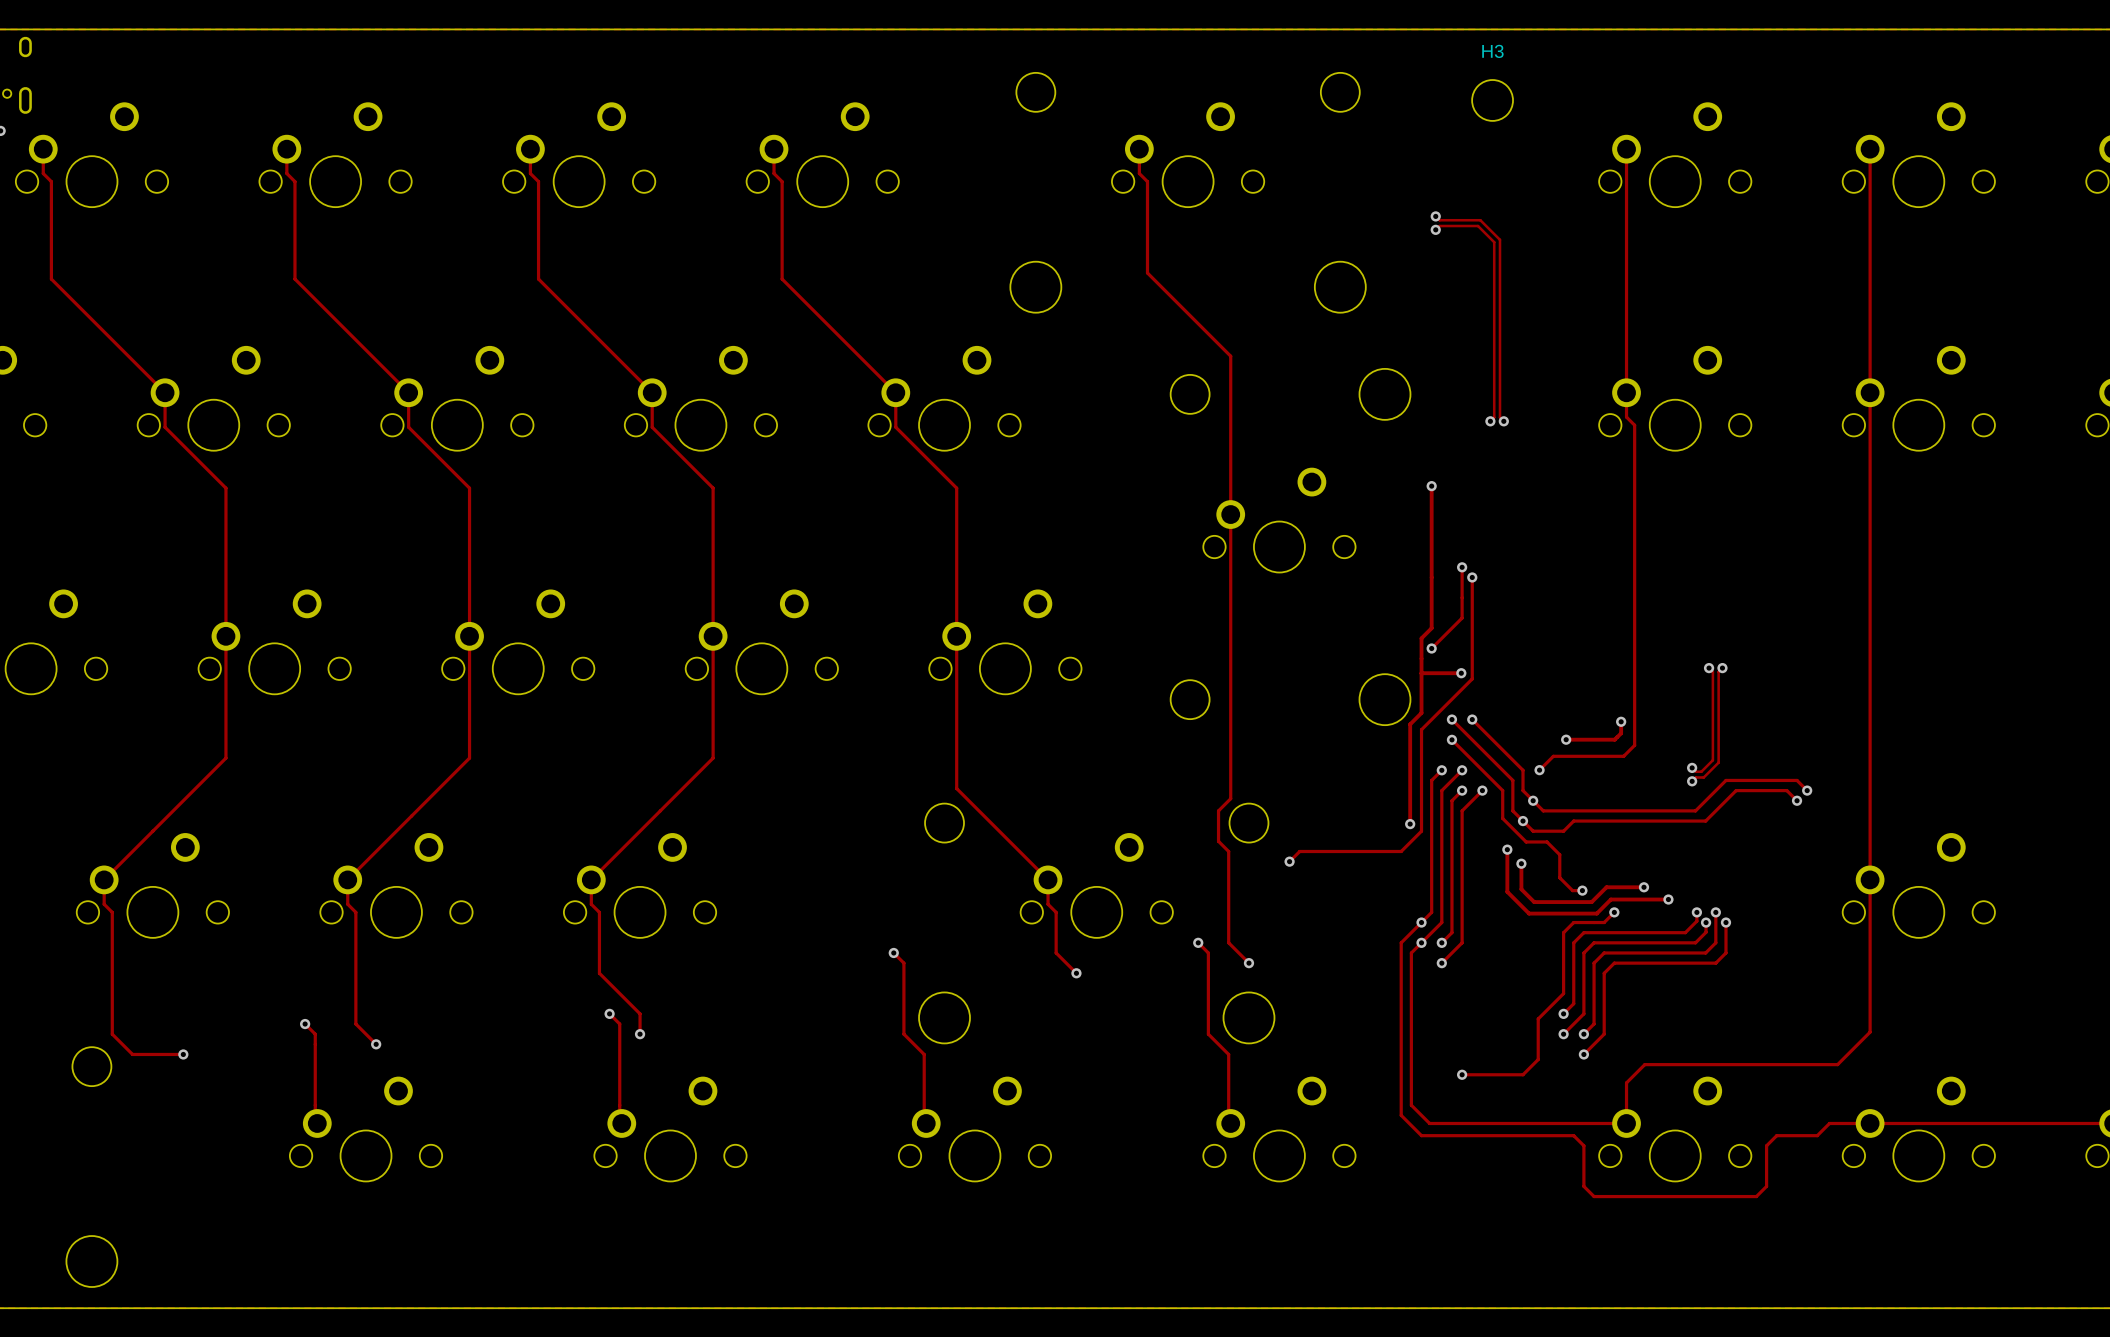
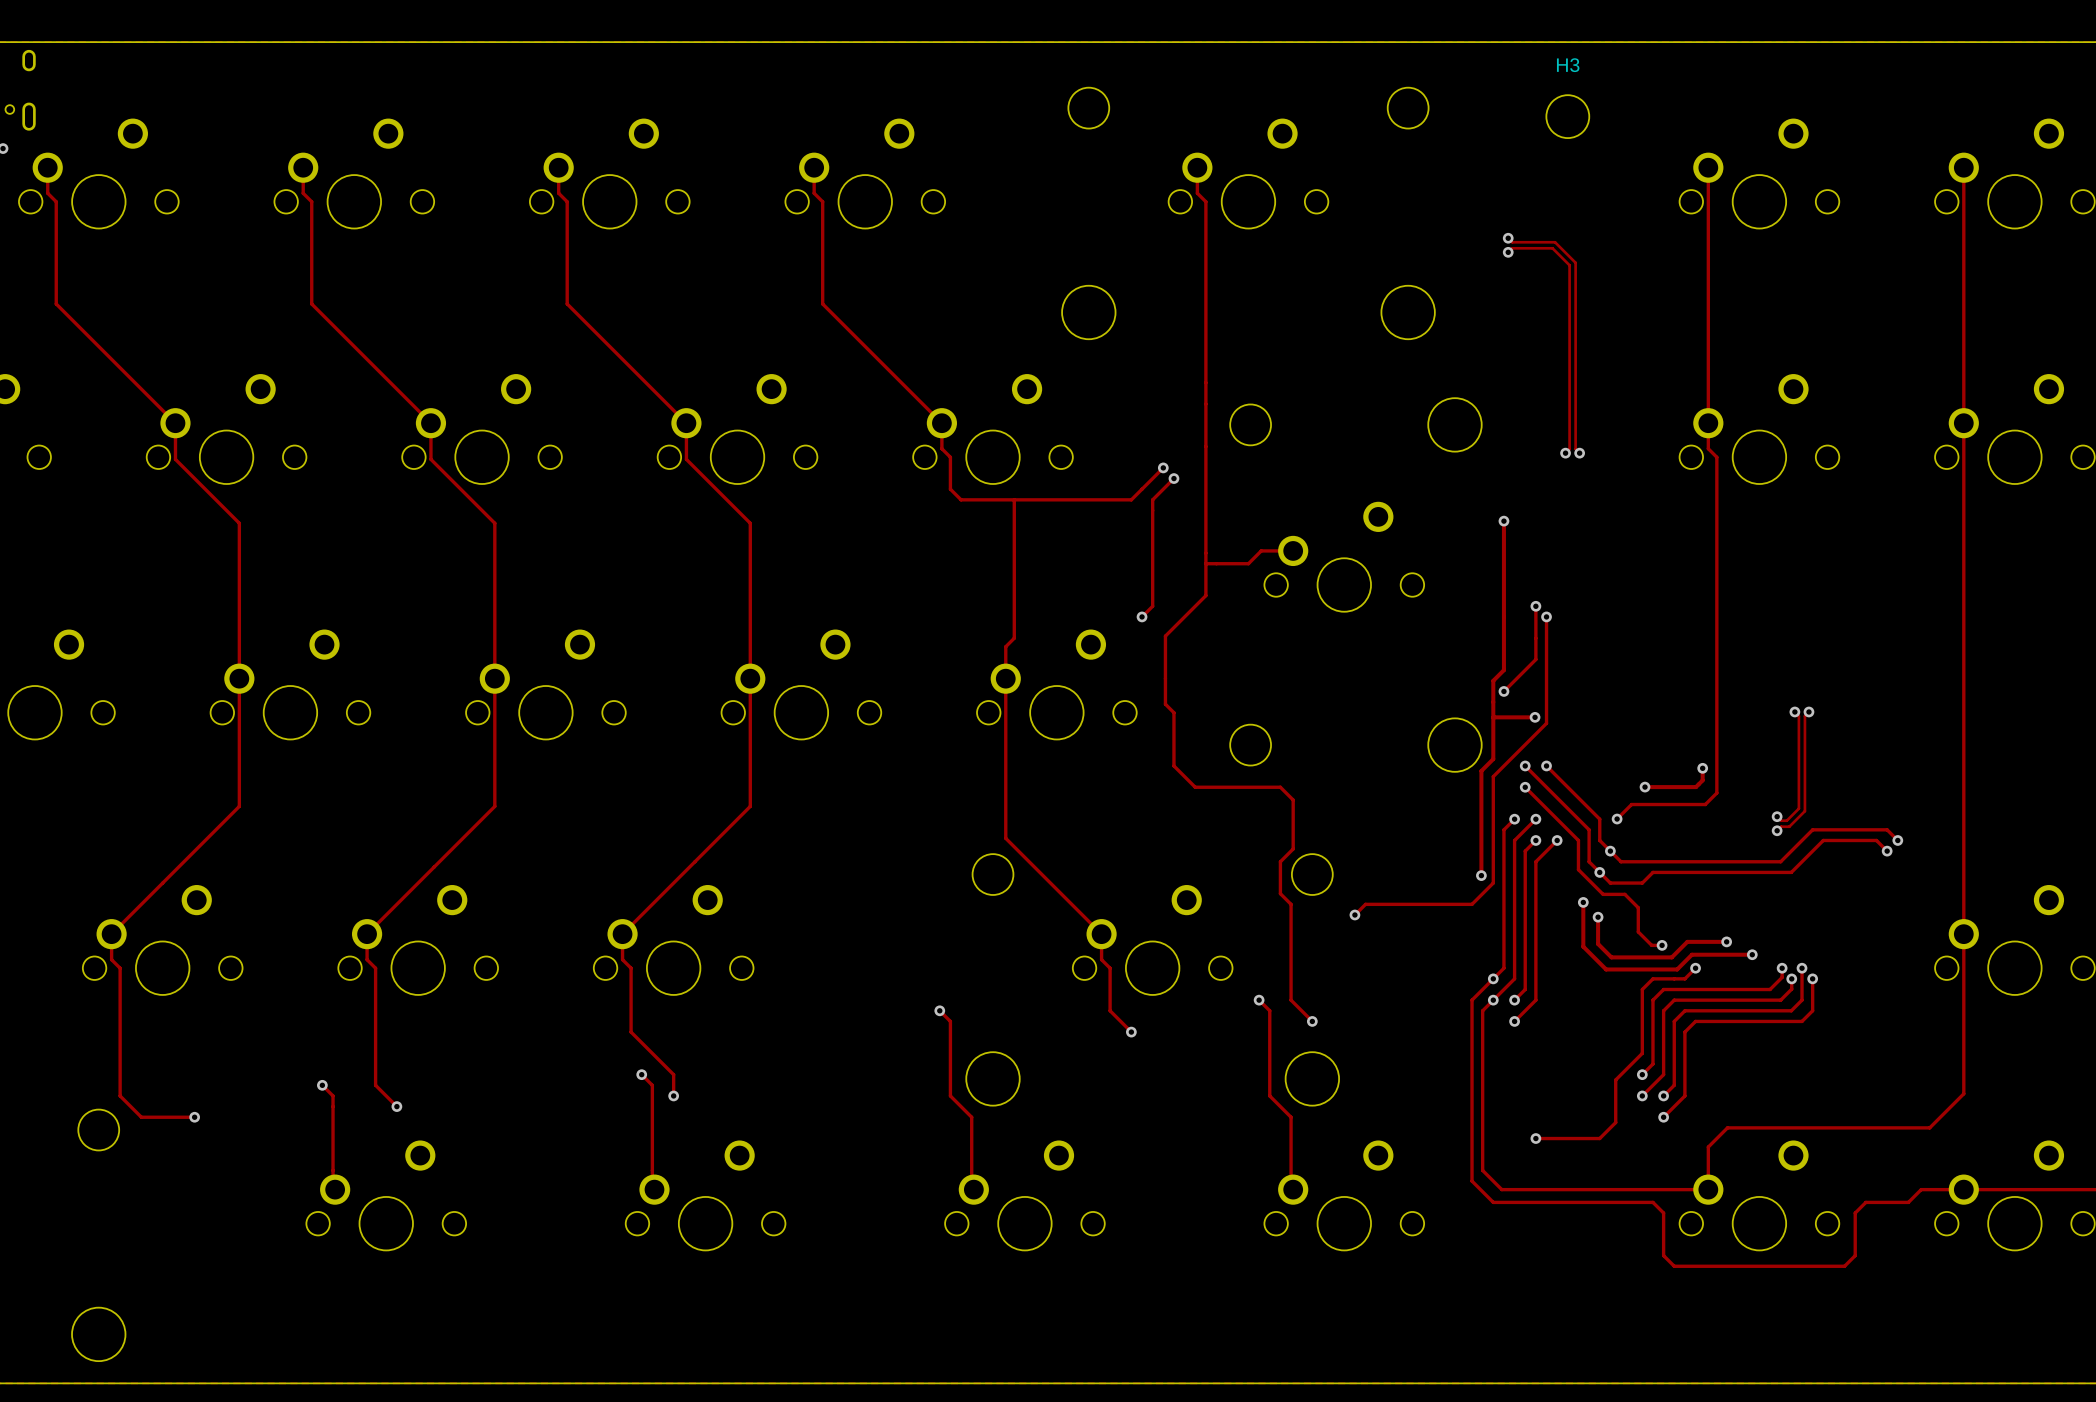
track: (1147, 273) (1230, 356) (1230, 752) -> (1205, 297) (1205, 595) (1165, 636) (1165, 704) (1173, 712) (1173, 765) (1195, 787) (1280, 787) (1293, 800)
track: (895, 417) (895, 427) (956, 488) (956, 605) -> (1014, 499) (1014, 638) (1005, 646)
track: none -> (941, 448) (950, 457) (950, 489) (961, 499) (1131, 499) (1163, 467)
via: none -> (1163, 467)
track: none -> (1173, 478) (1152, 499) (1152, 606) (1142, 616)
via: none -> (1173, 478)
track: none -> (1293, 550) (1261, 550) (1248, 563) (1205, 563)
via: none -> (1142, 616)

